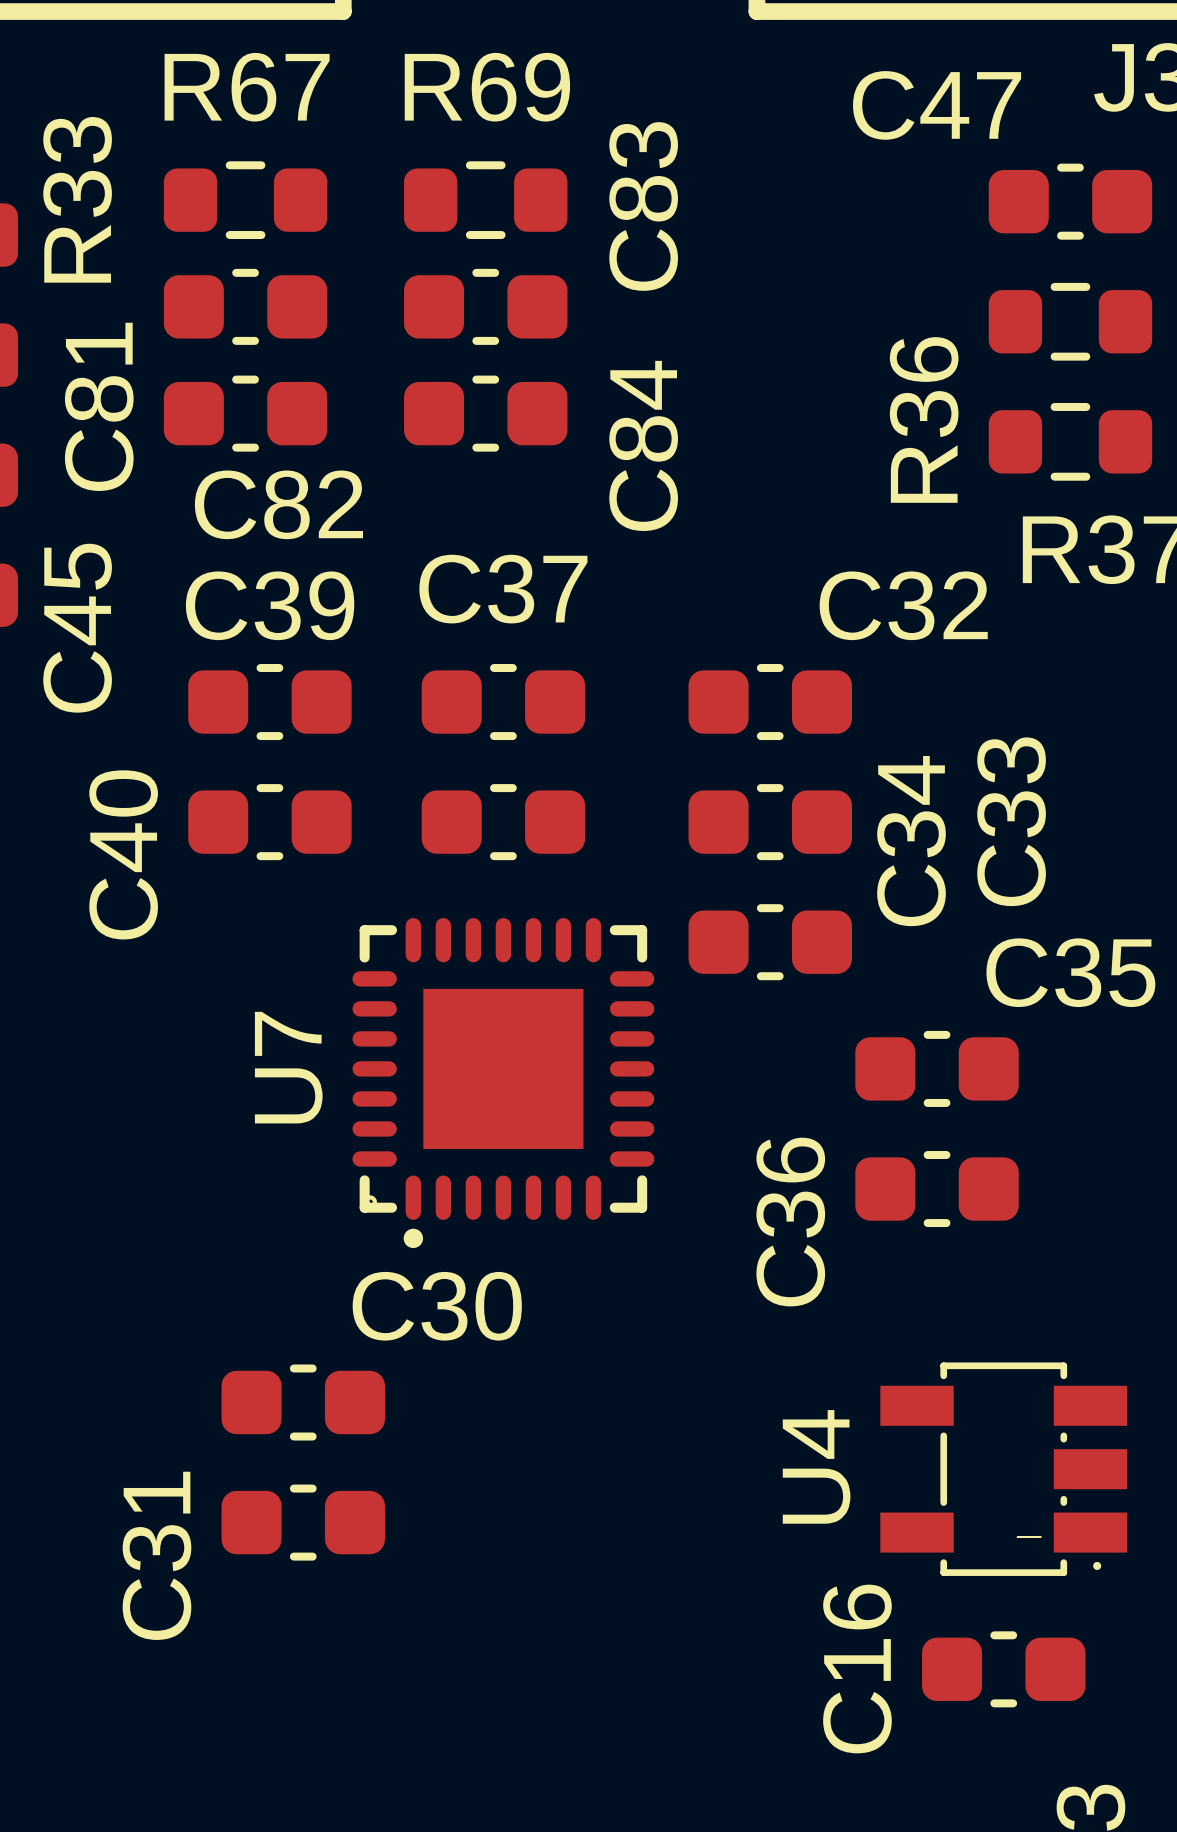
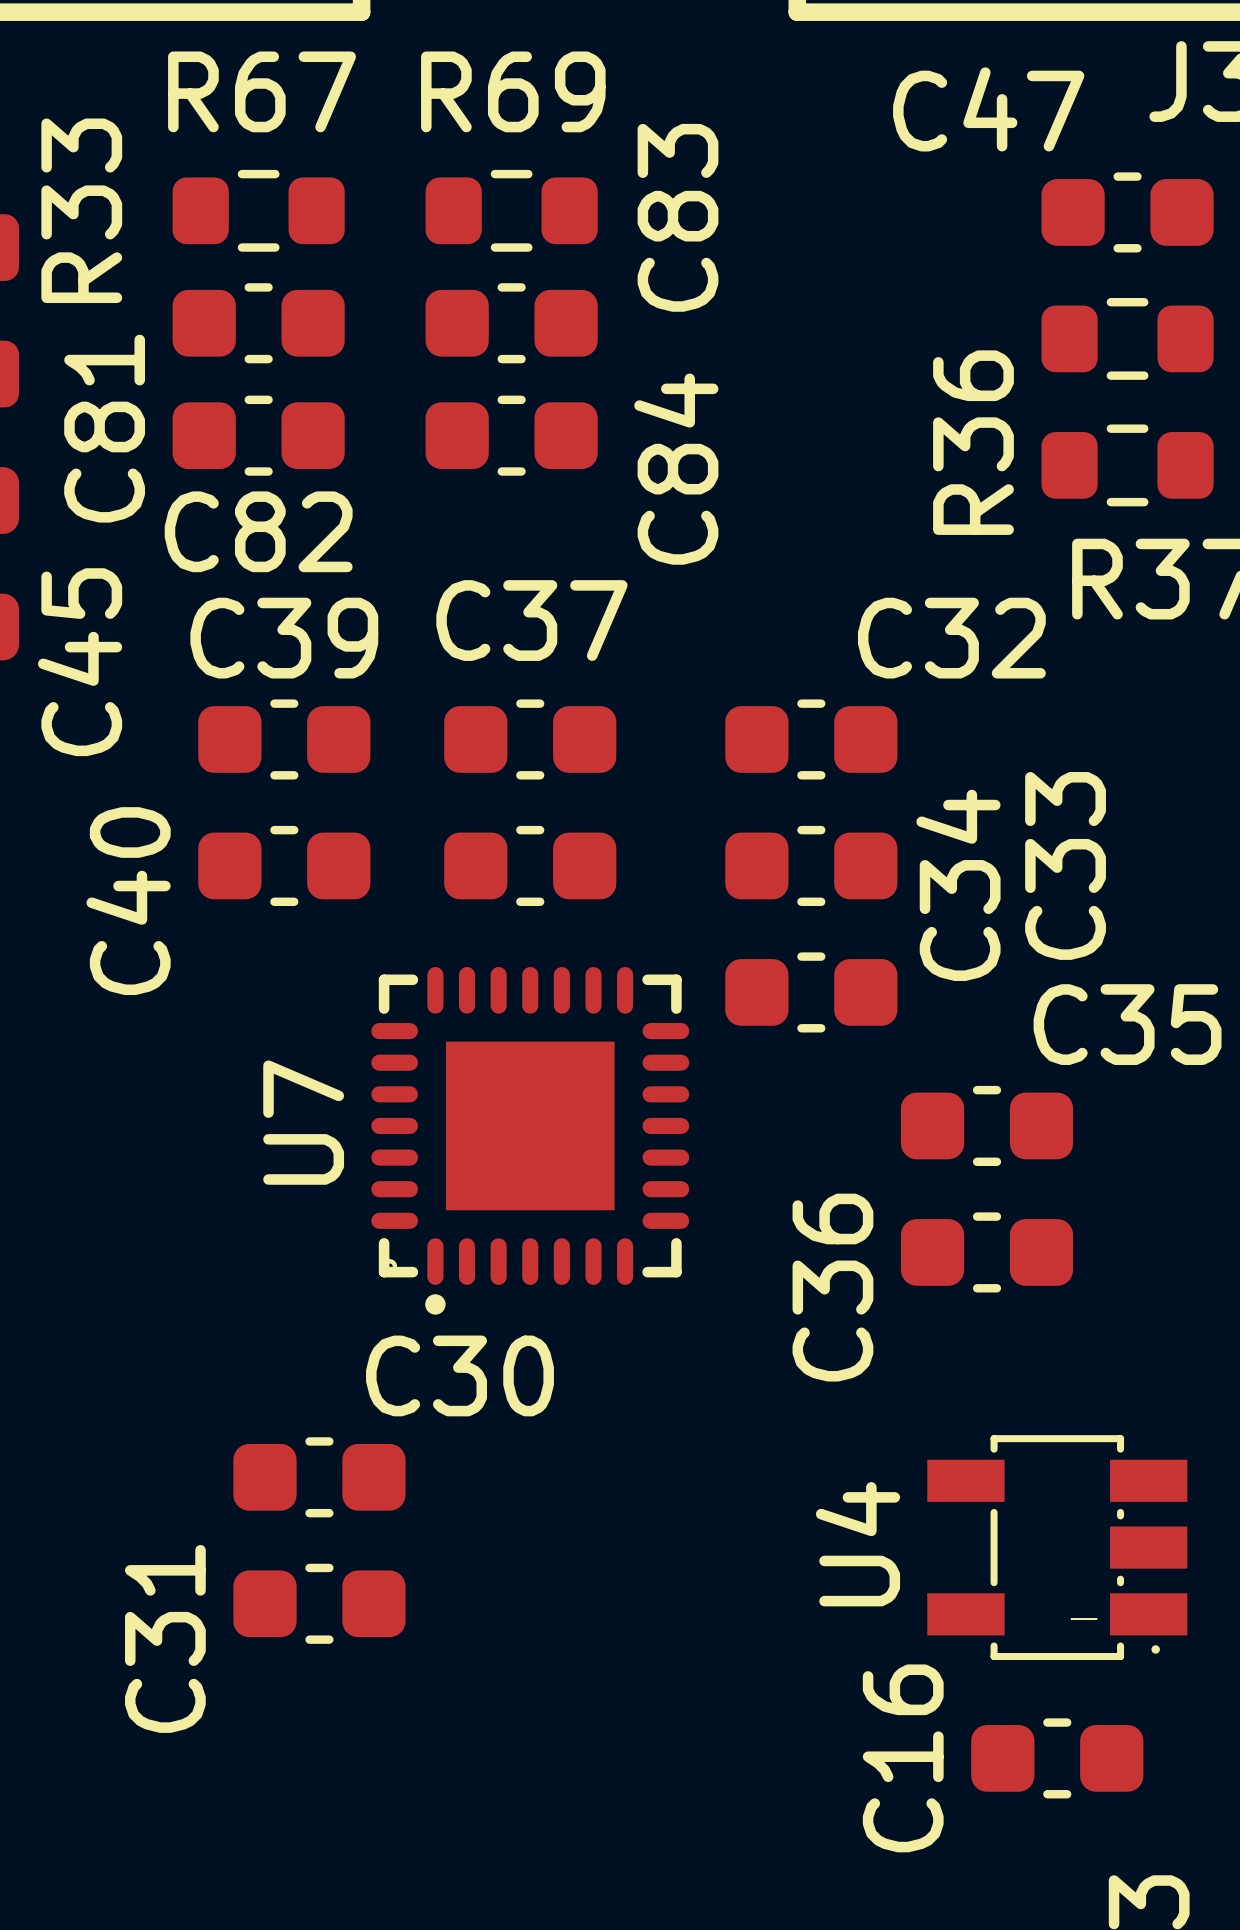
C82 name position: C82 (278, 504) -> C82 (258, 531)

